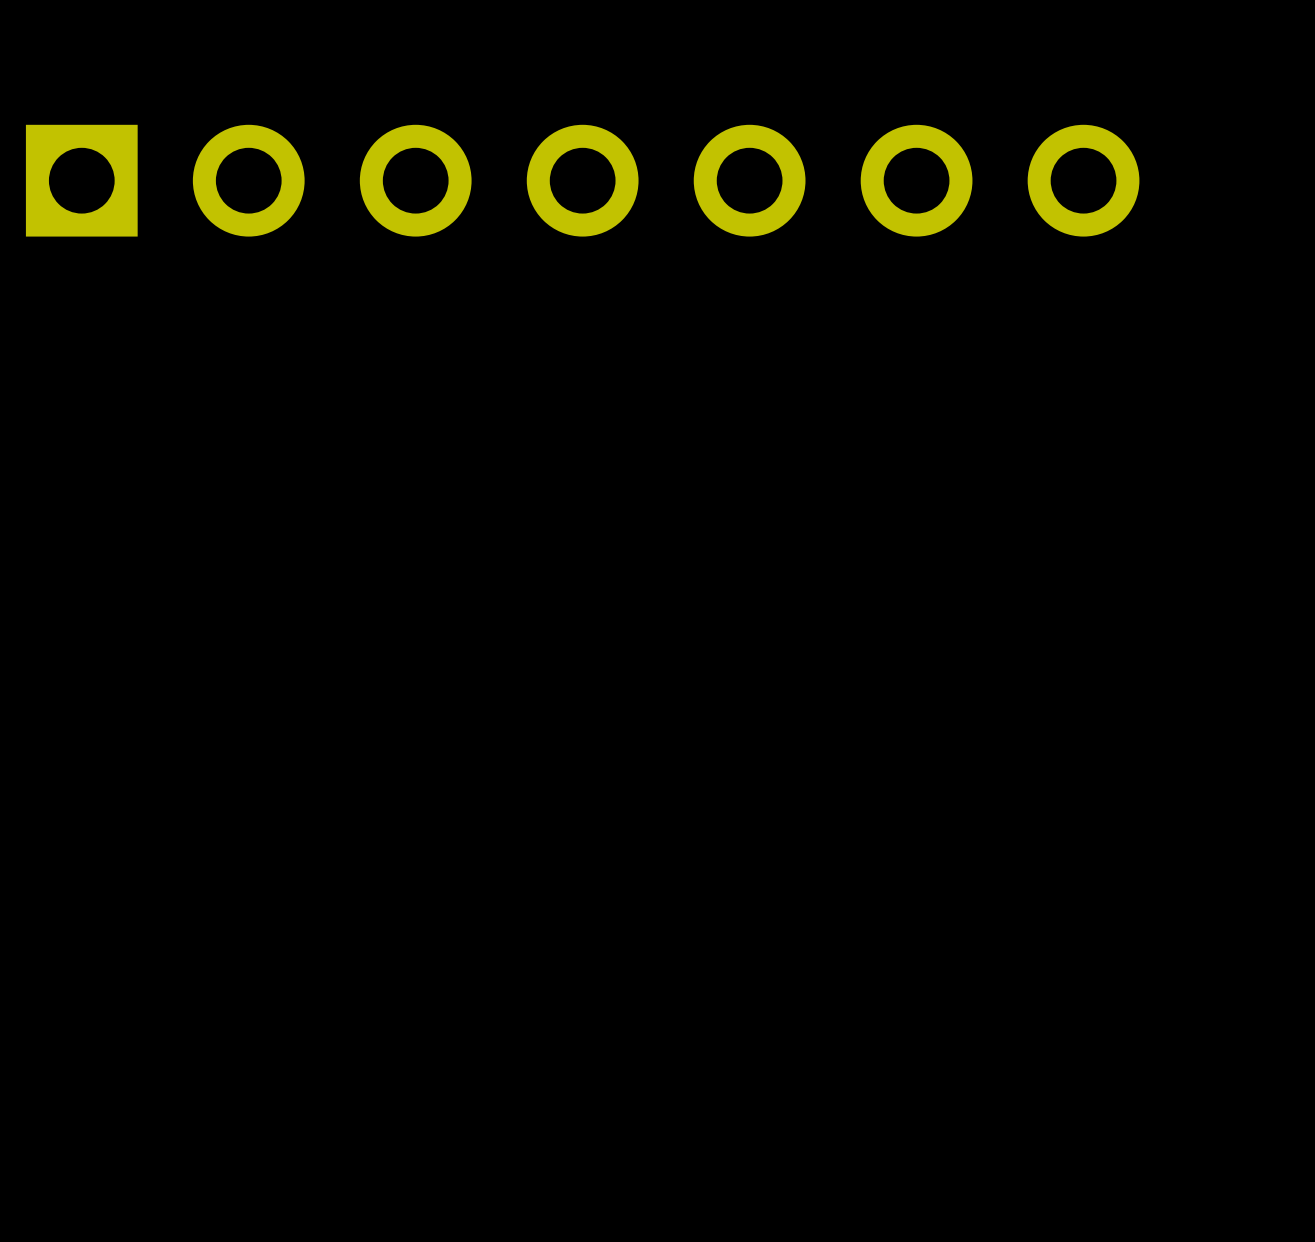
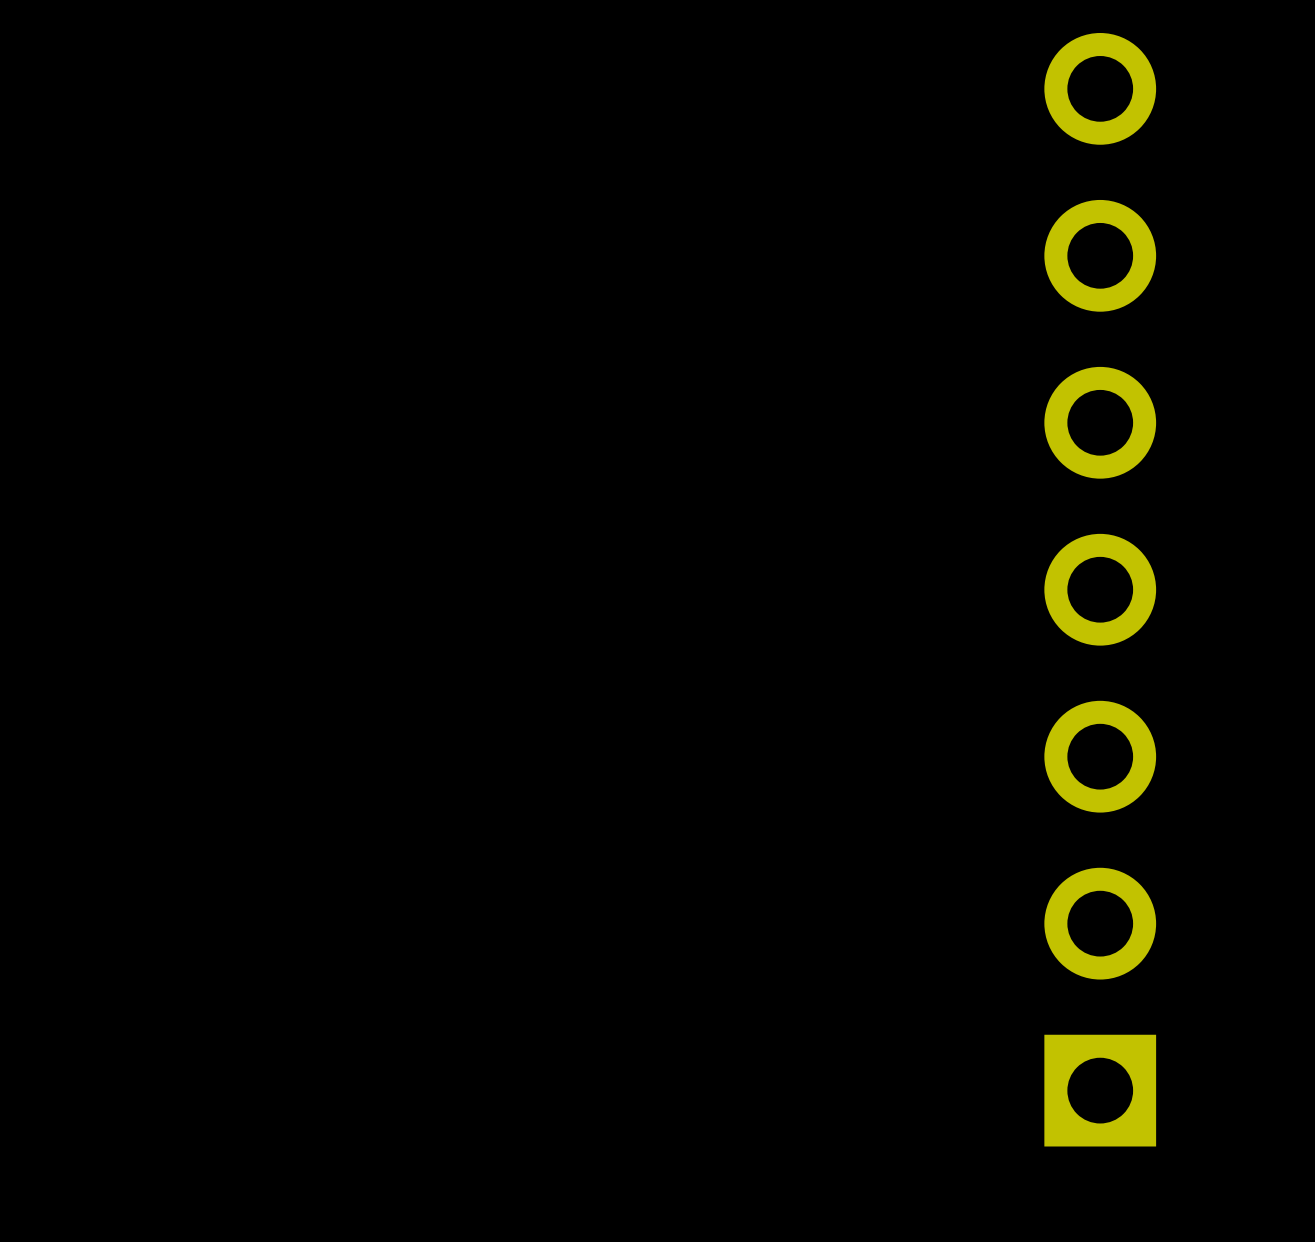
part rotation: 0° (582, 180) -> 90° counterclockwise (1100, 589)

